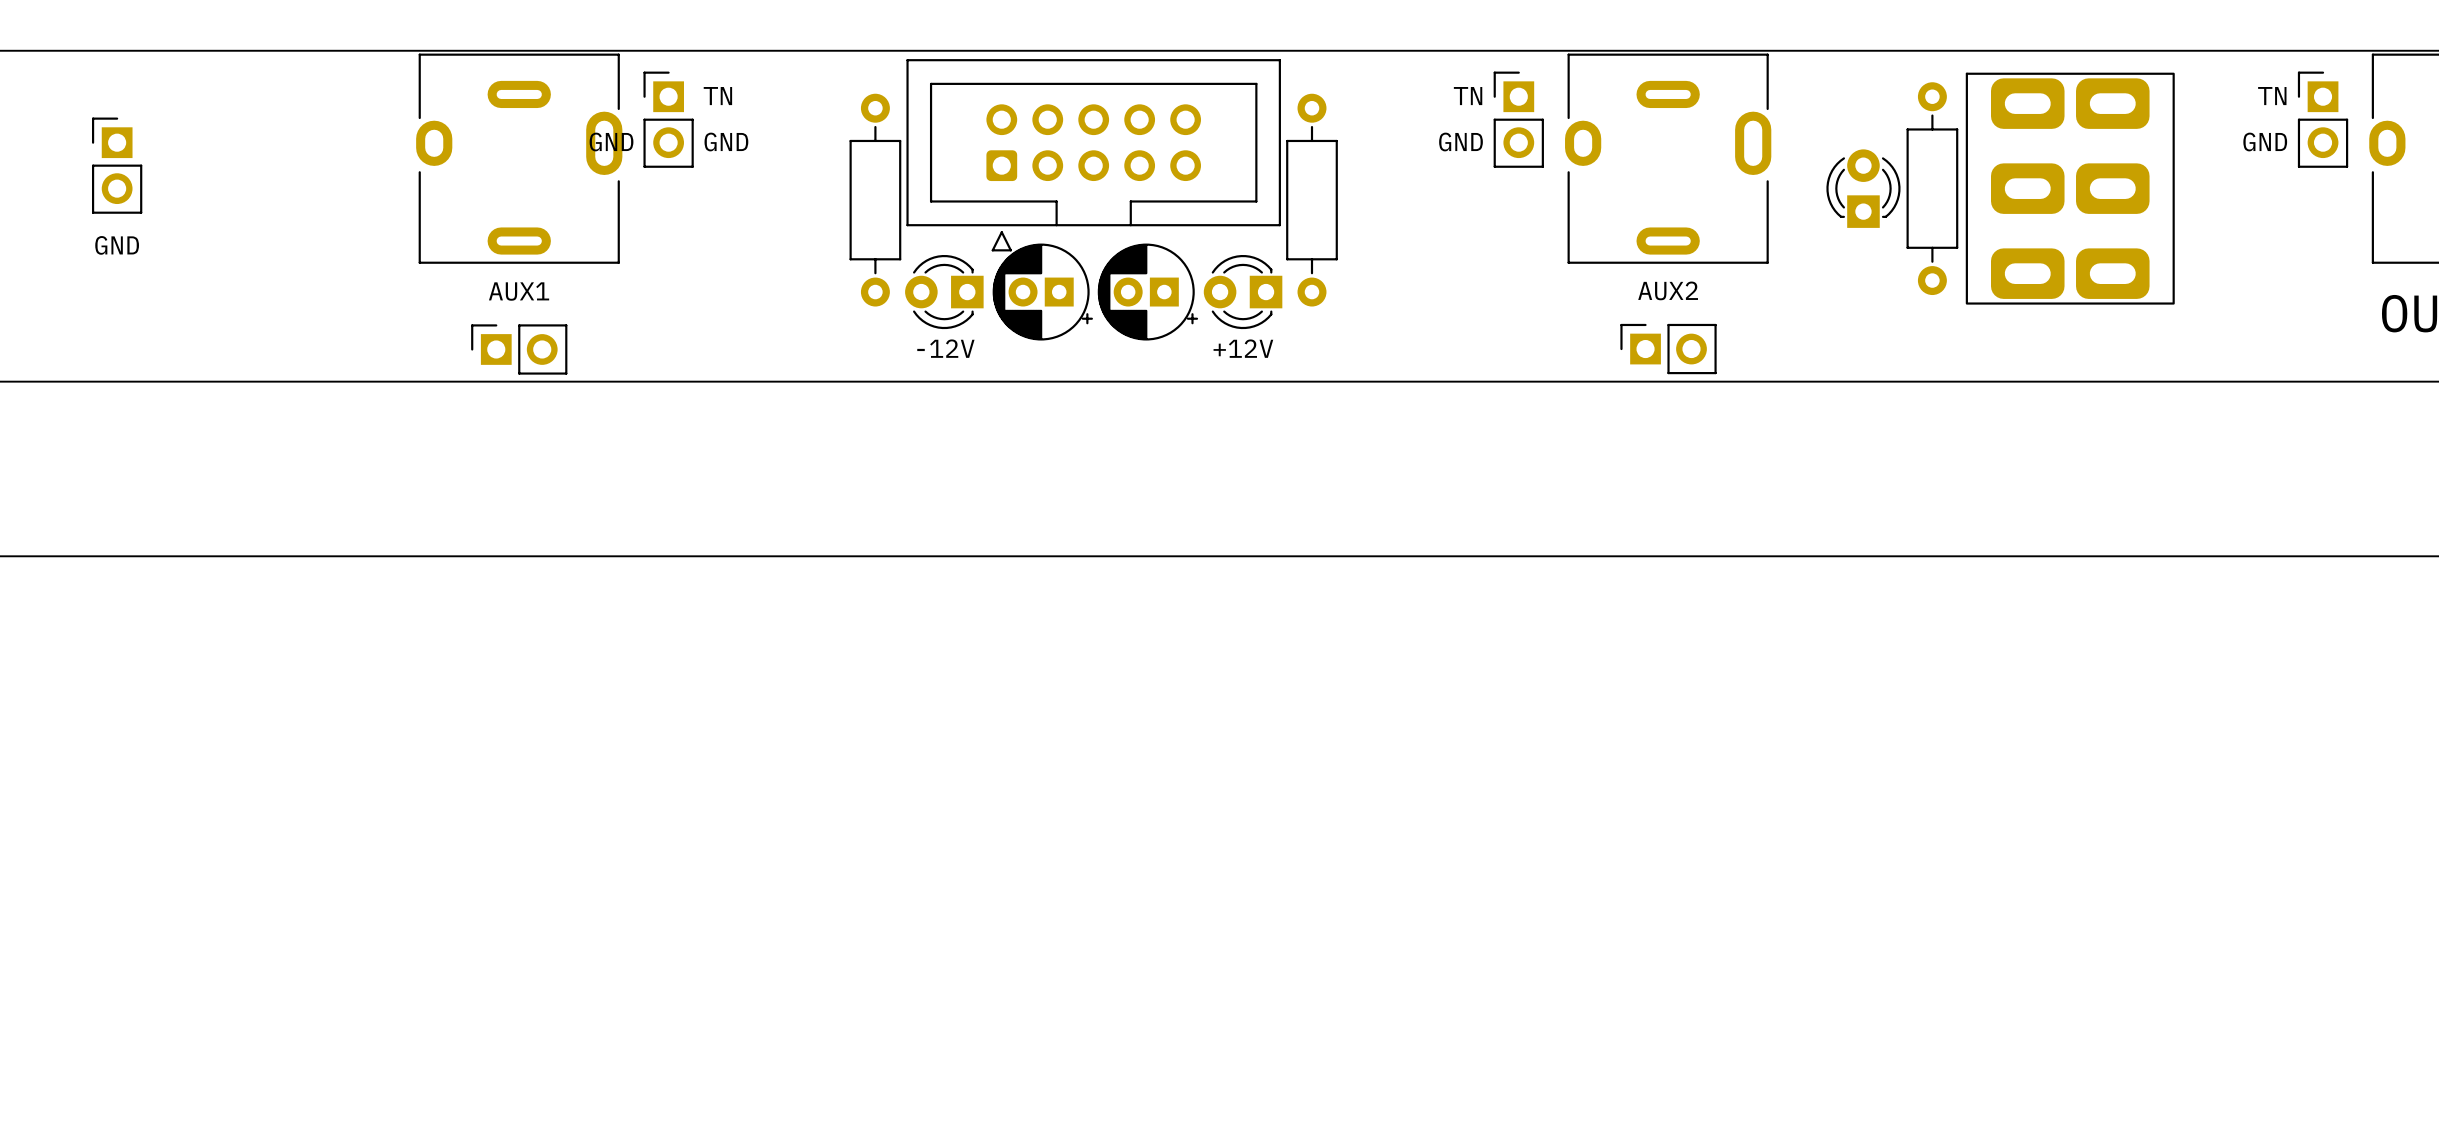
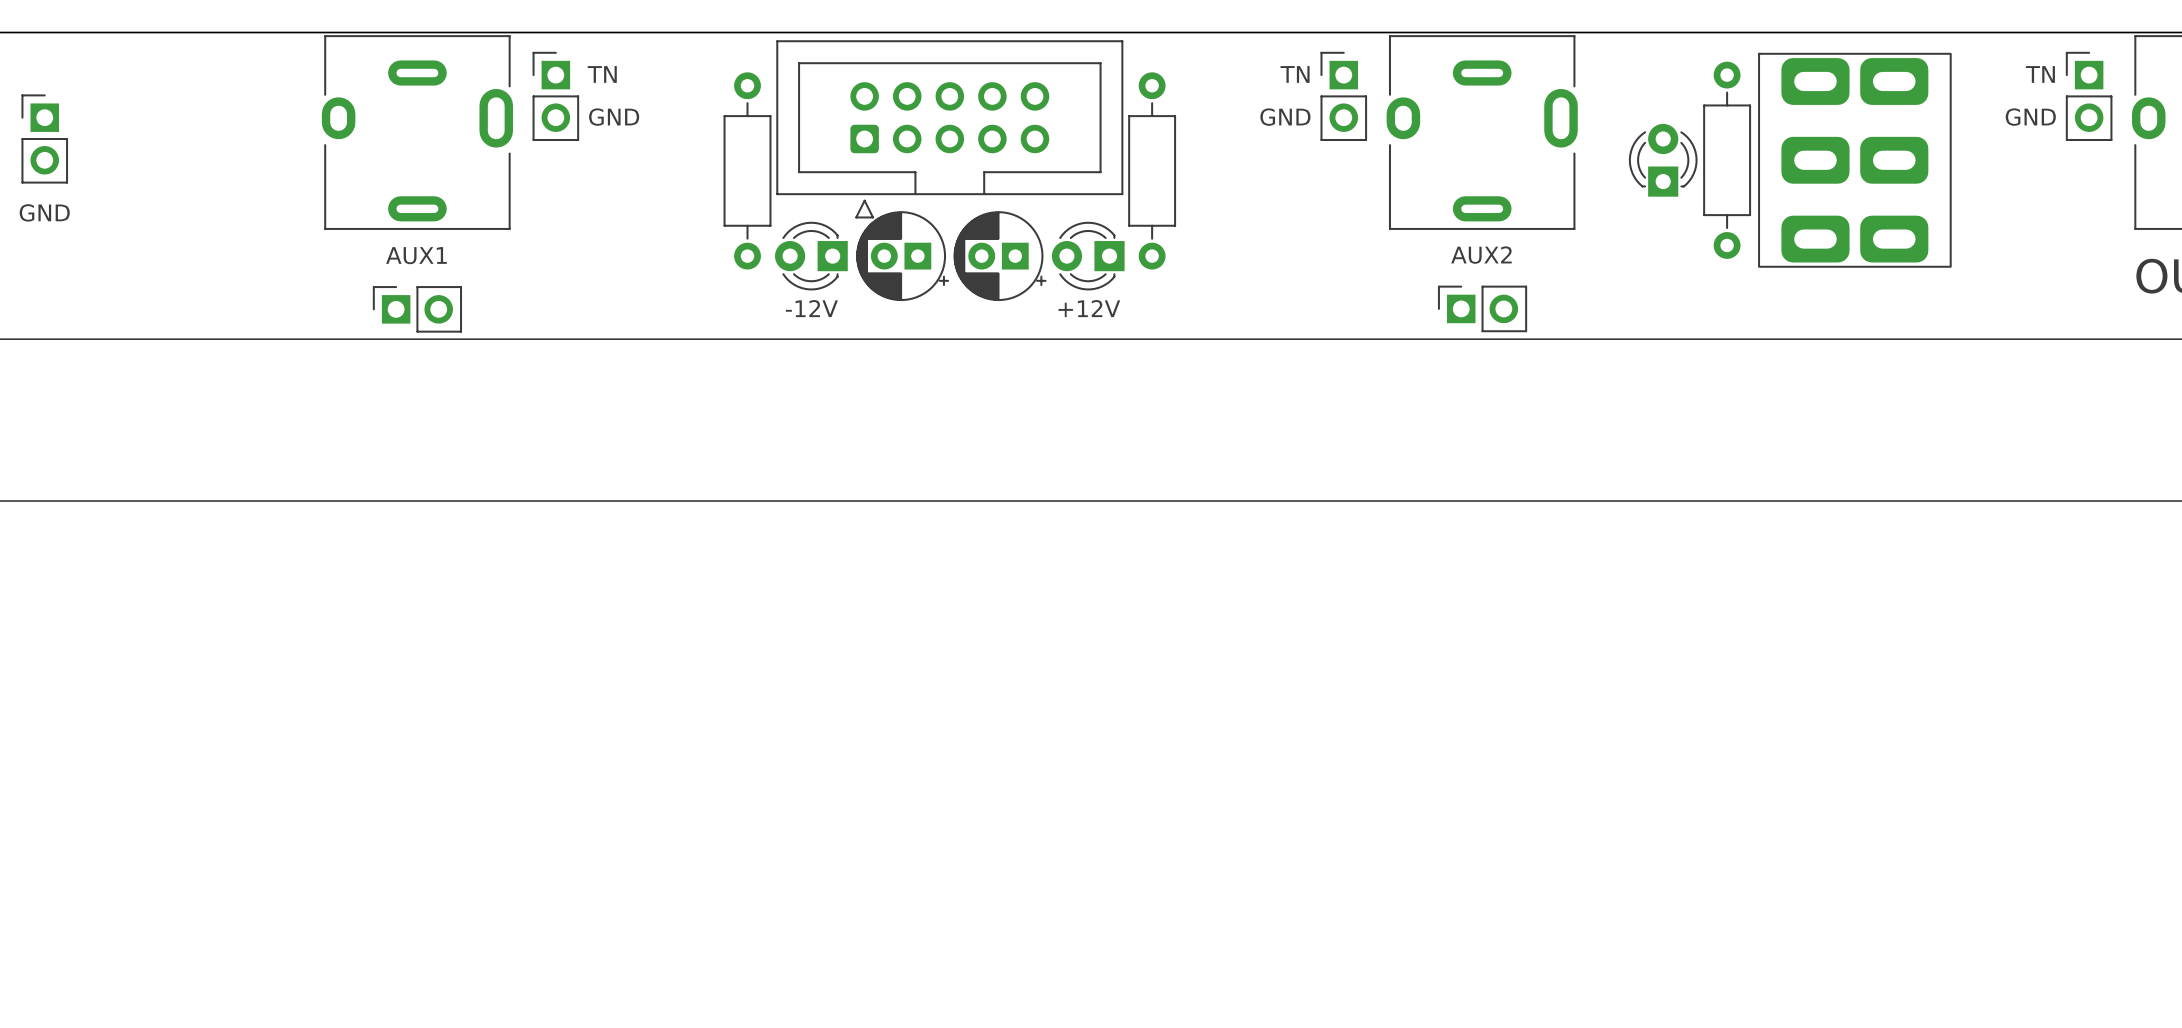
text: GND (611, 142) -> none

